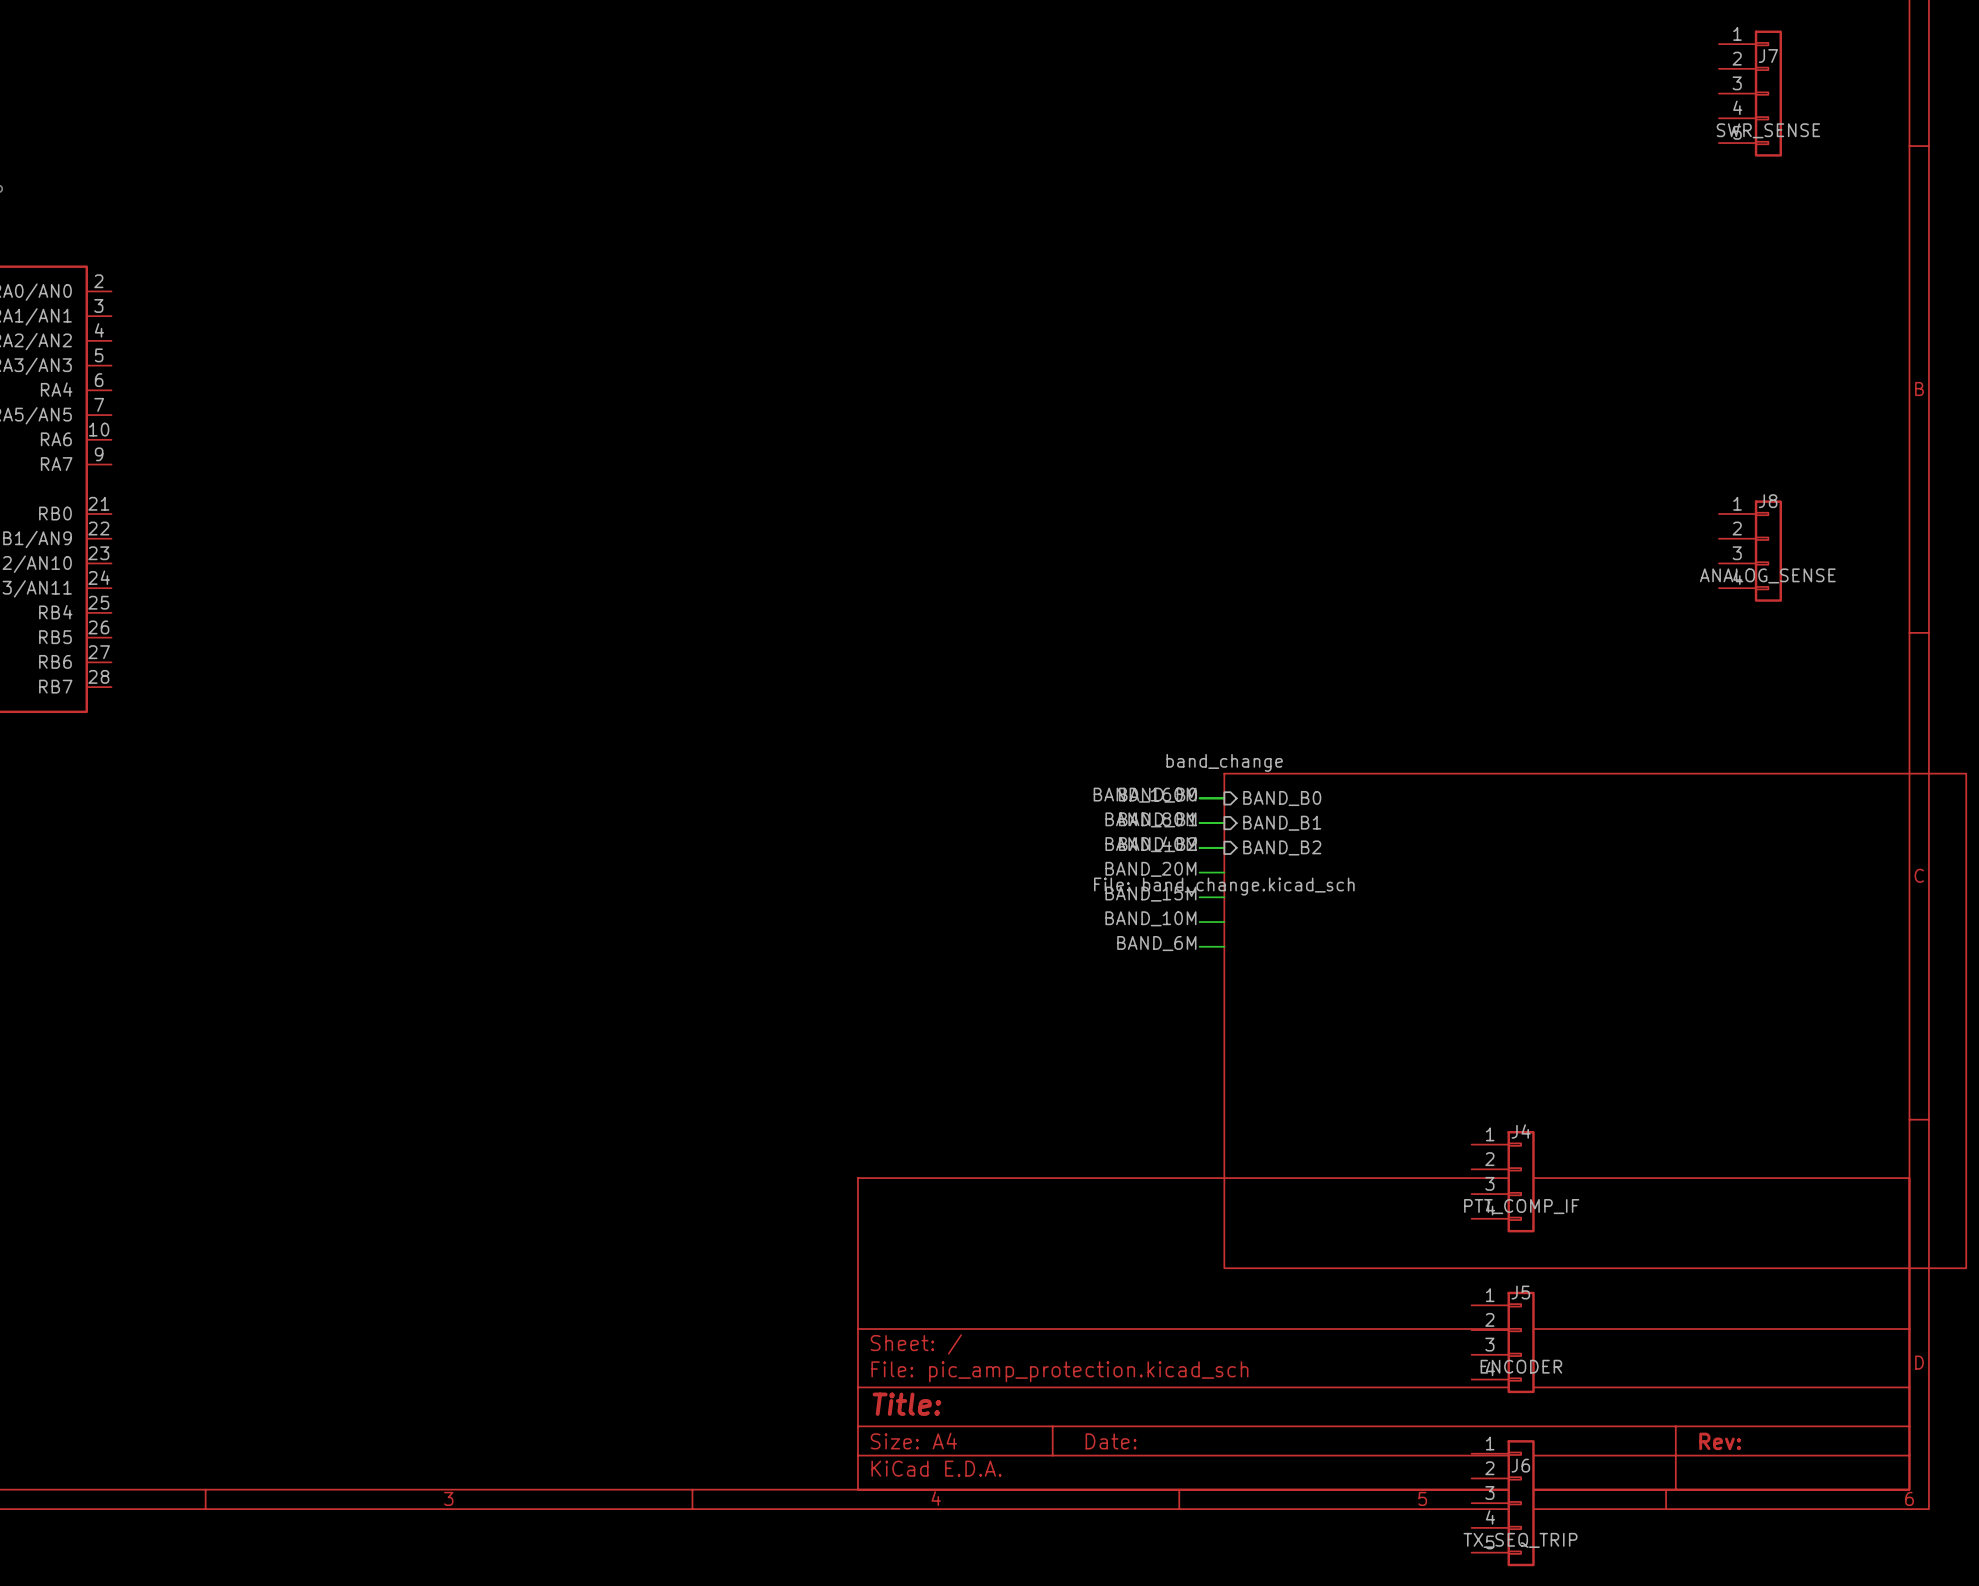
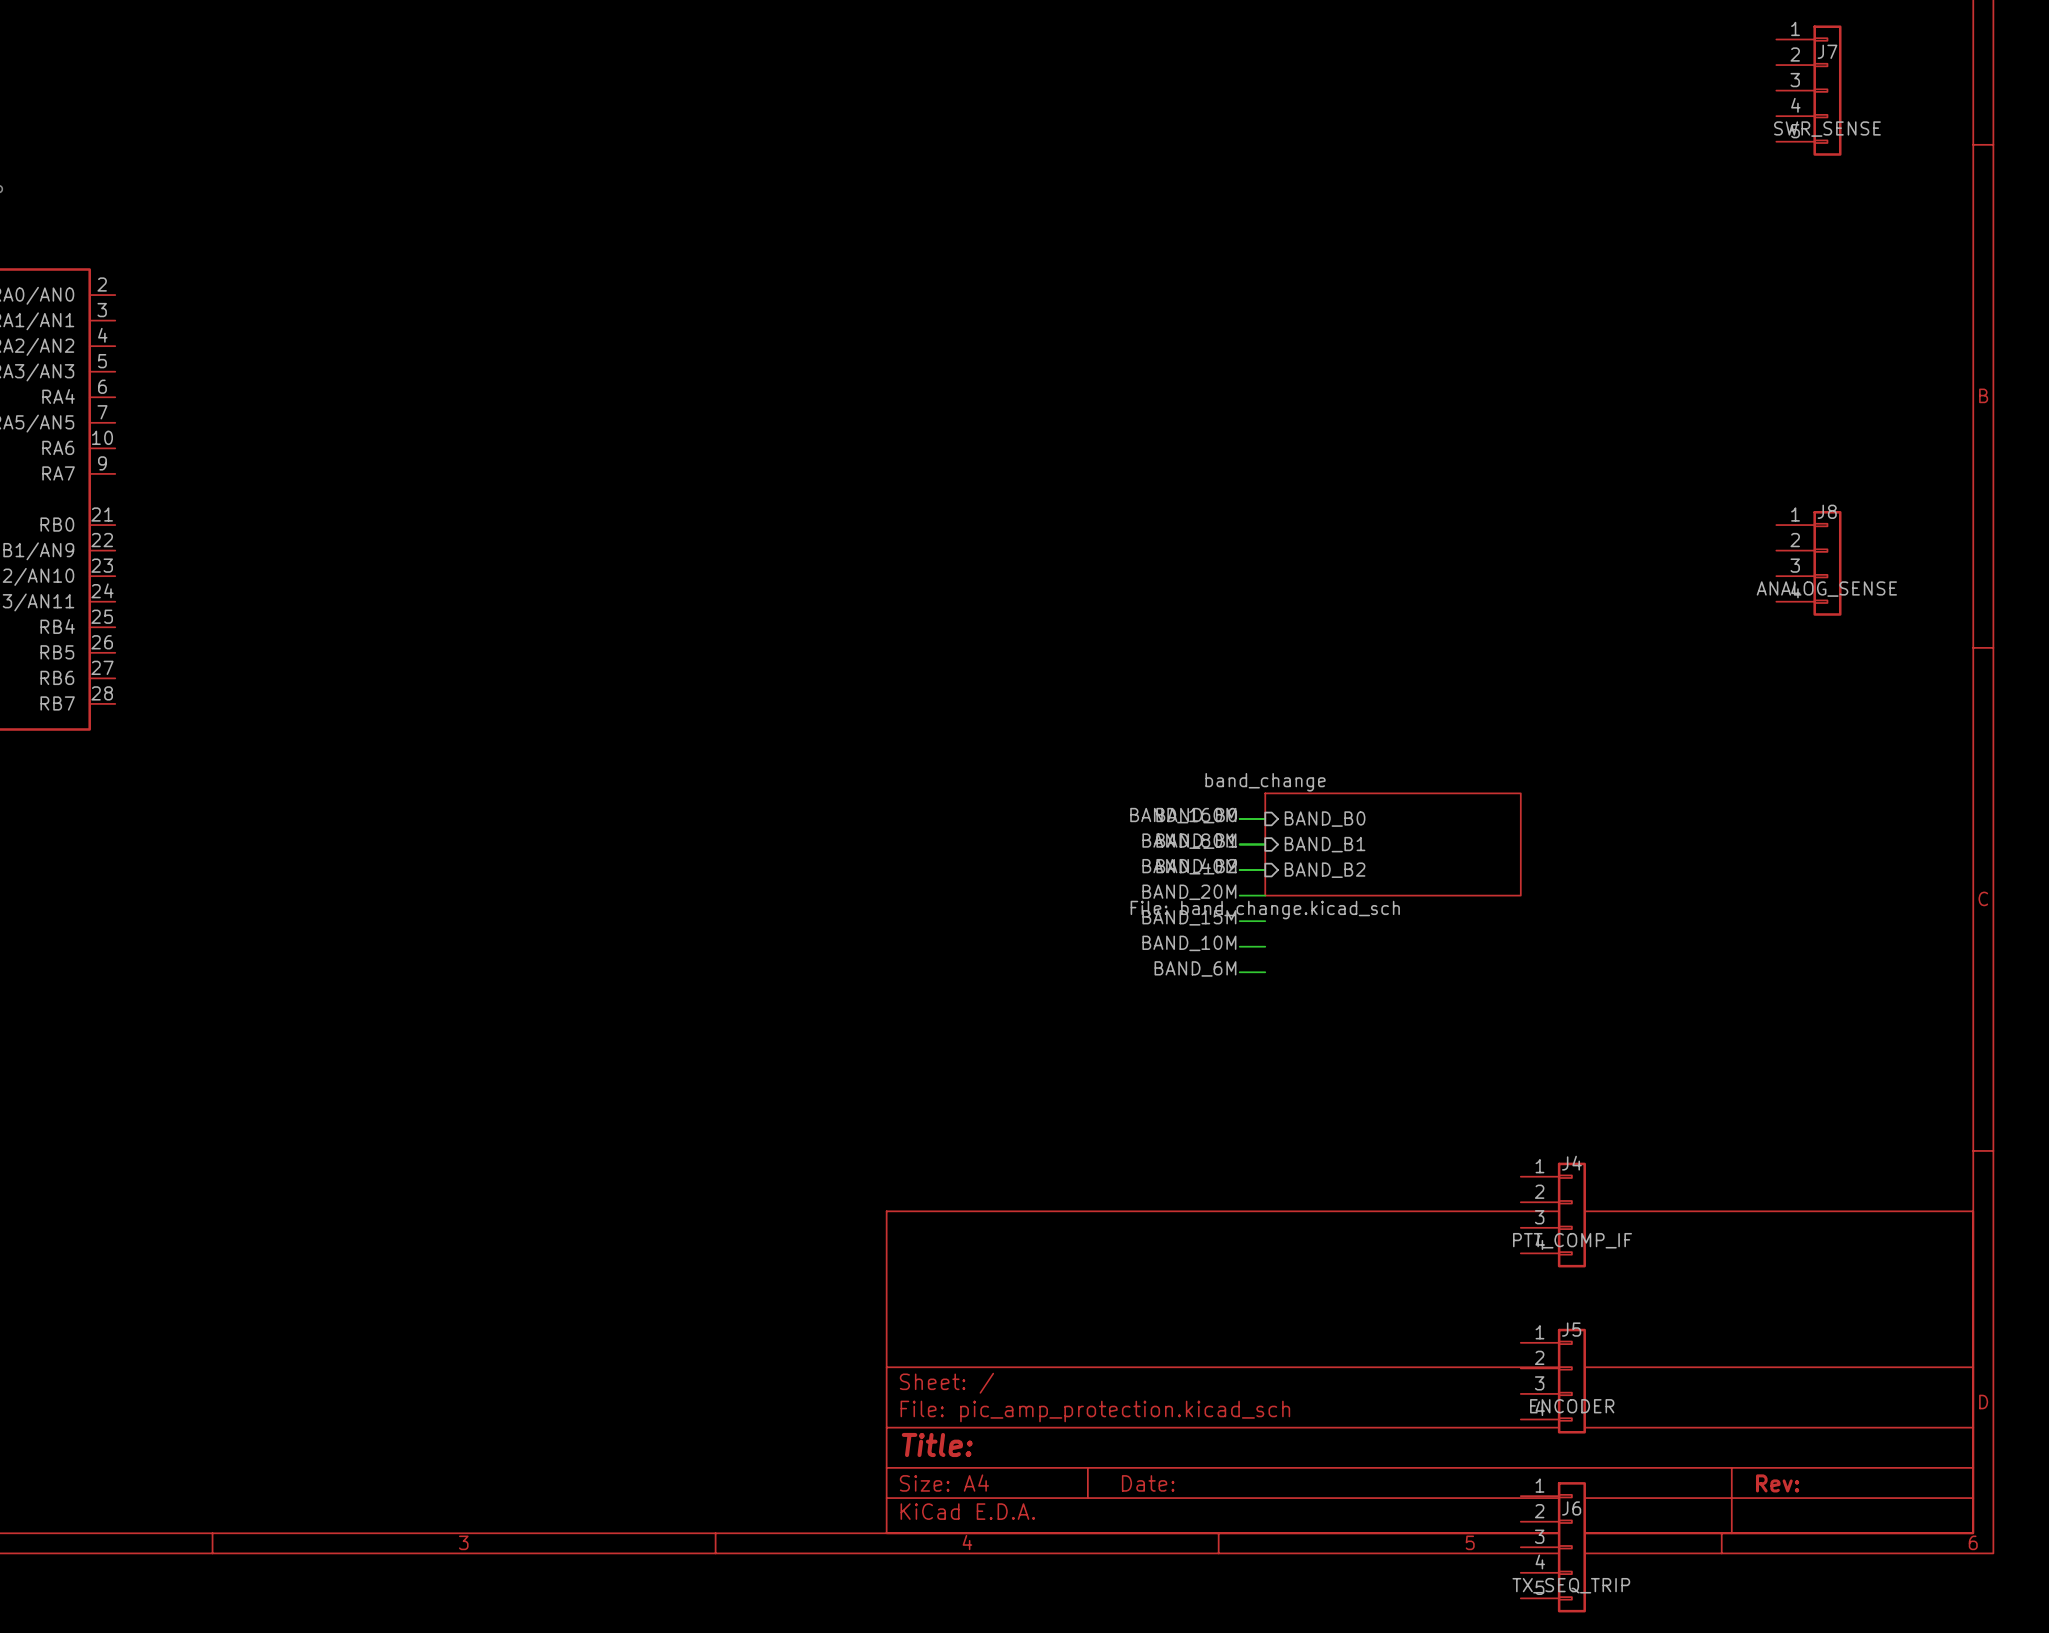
sheet band_change: none -> File: band_change.kicad_sch (1393, 844)
sheet band_change: File: band_change.kicad_sch (1595, 1020) -> none

